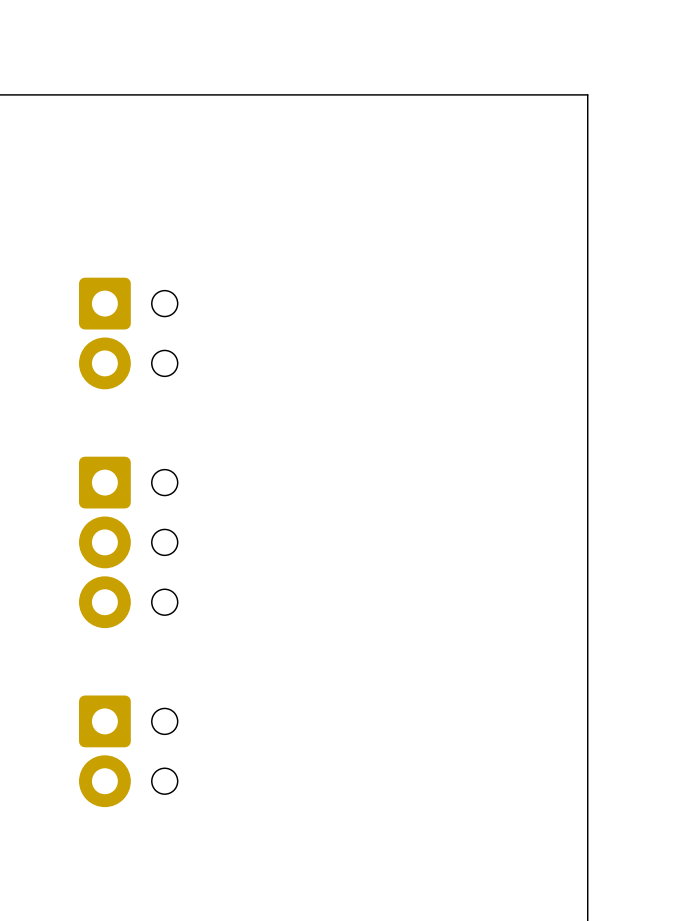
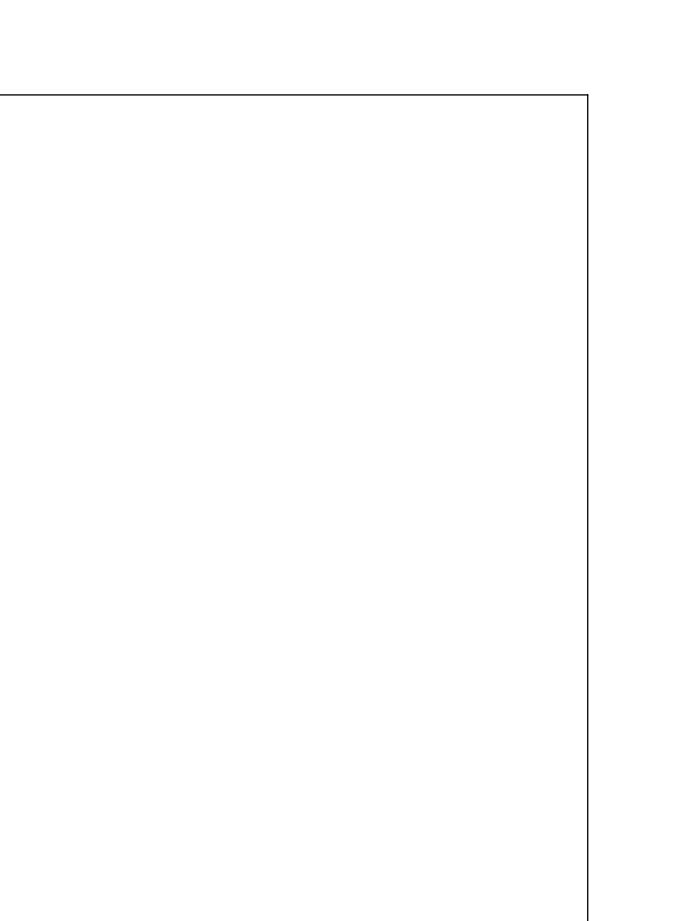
part: (128, 333) -> none
part: (128, 542) -> none
part: (128, 751) -> none

